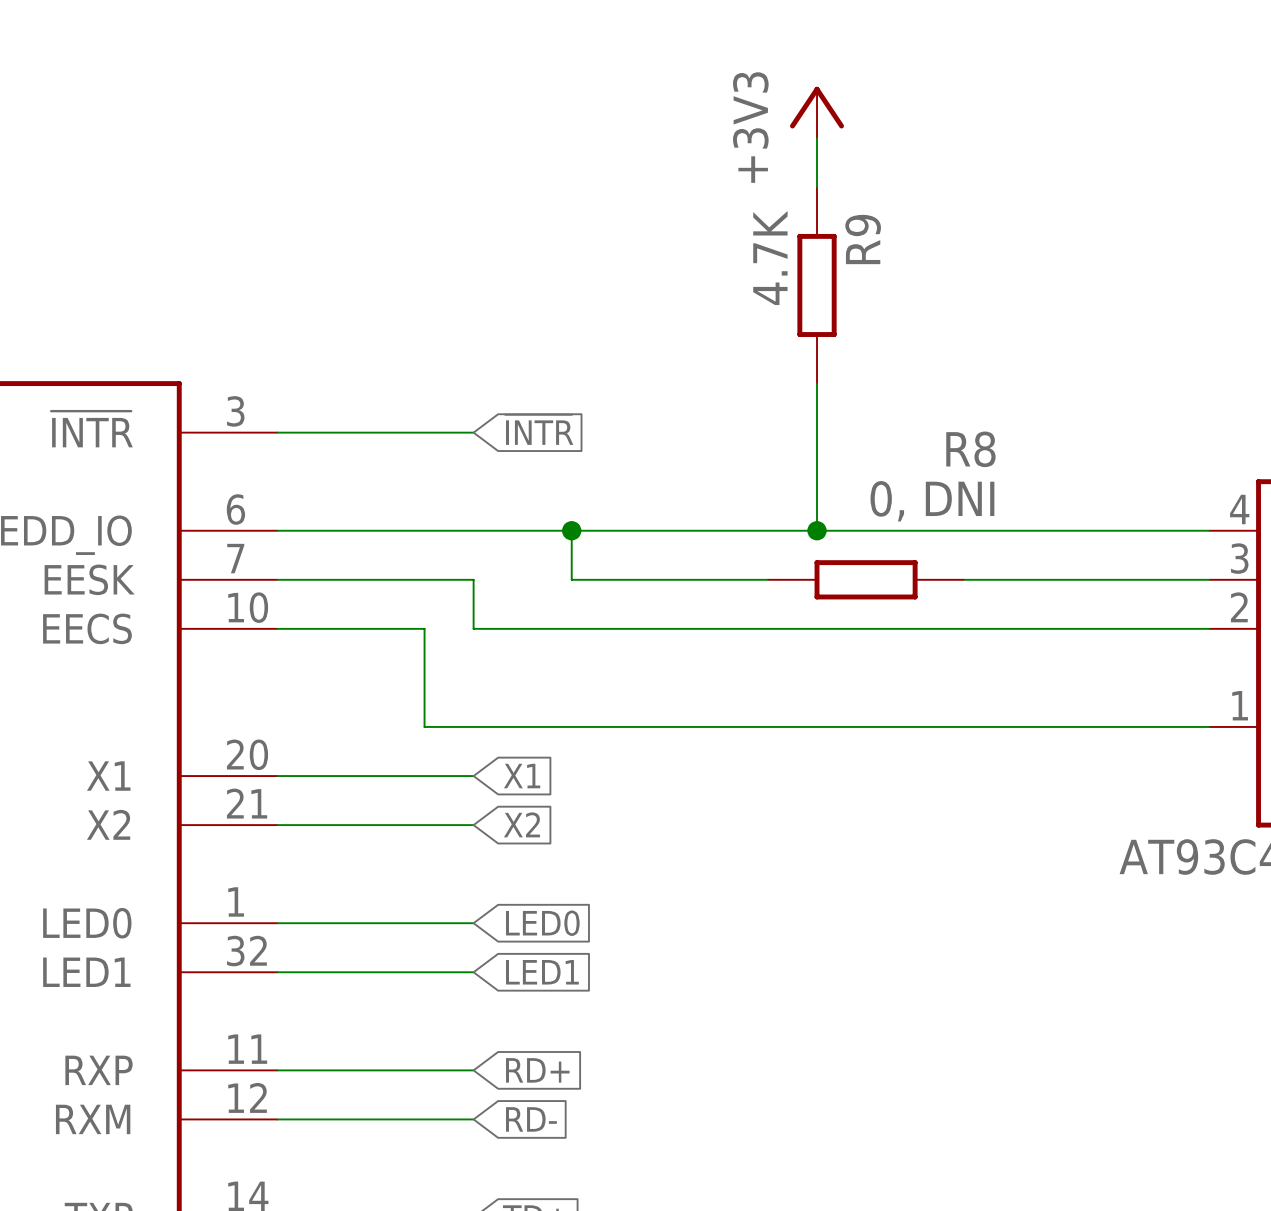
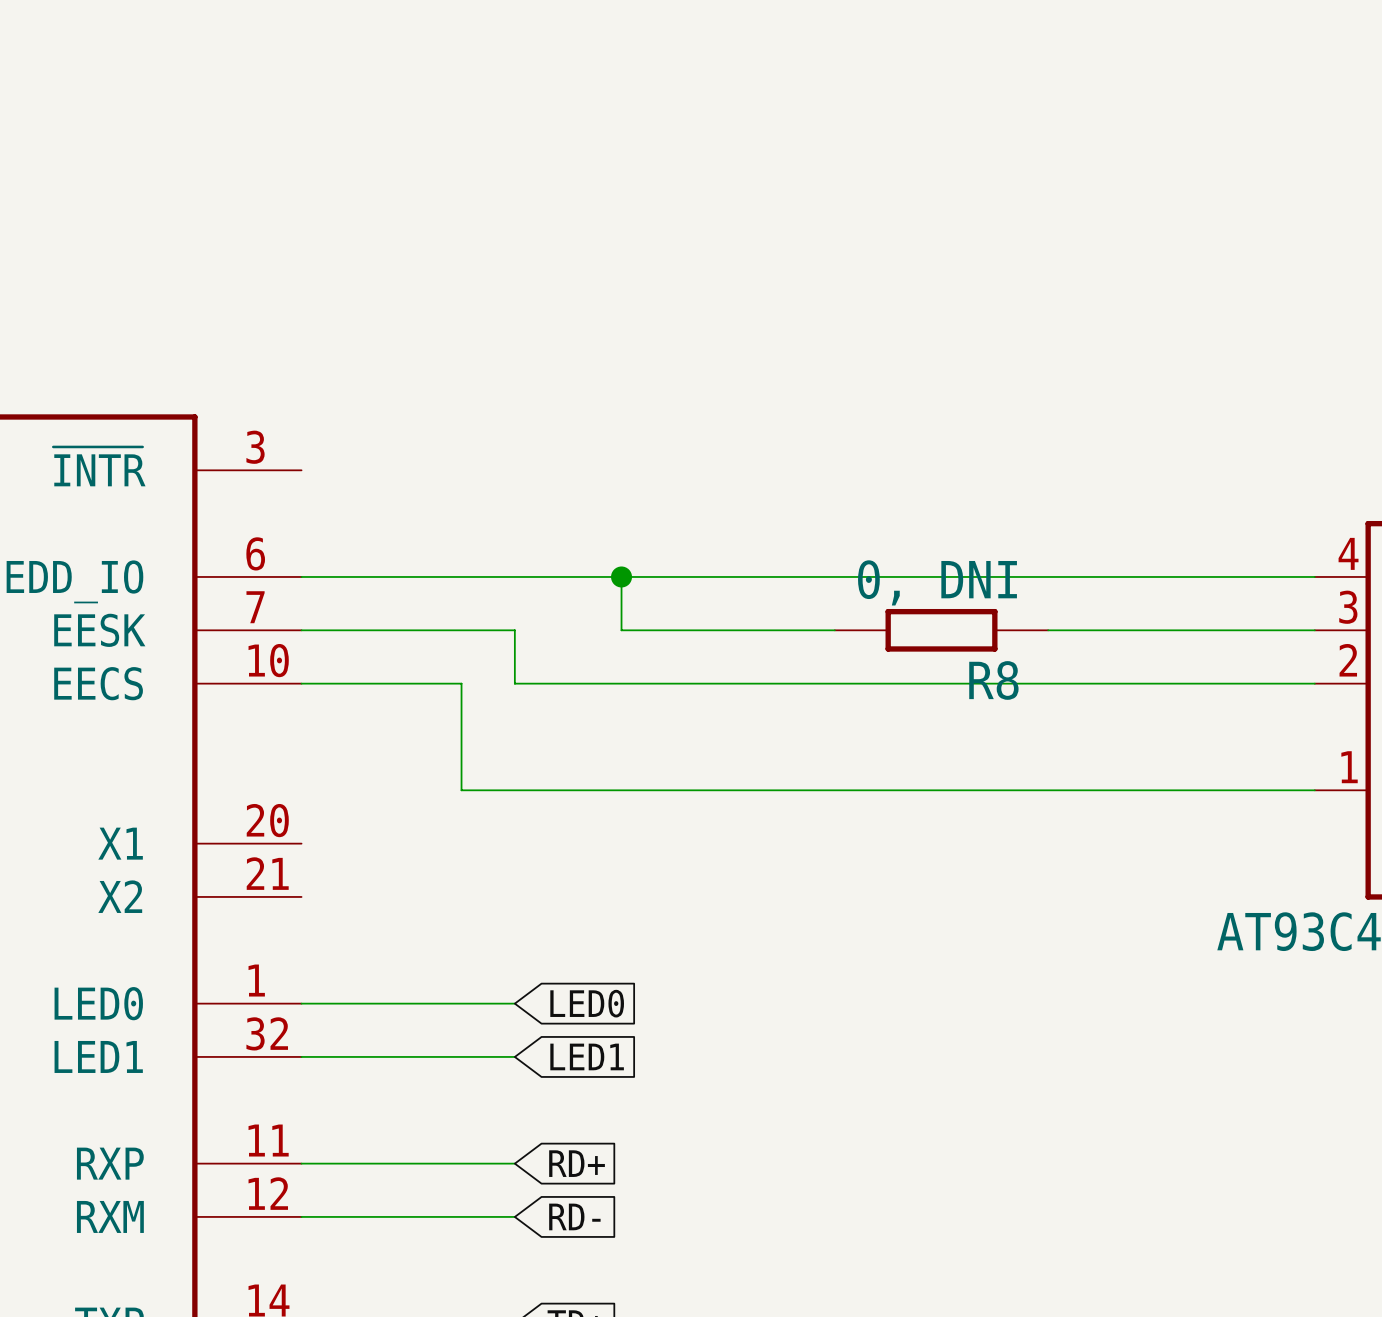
power symbol: +3V3 (817, 112) -> none
wire: (817, 138) (817, 187) -> none
R9: 4.7K (817, 285) -> none
wire: (817, 383) (817, 530) -> none
global label: ~{INTR} (539, 429) -> none
wire: (277, 432) (473, 432) -> none
R8 name position: R8 (970, 449) -> R8 (993, 680)
R8 value position: 0, DNI (932, 501) -> 0, DNI (937, 582)
junction: (817, 530) -> none
wire: (277, 776) (473, 776) -> none
global label: X1 (522, 776) -> none
global label: X2 (521, 824) -> none
wire: (277, 825) (473, 825) -> none

